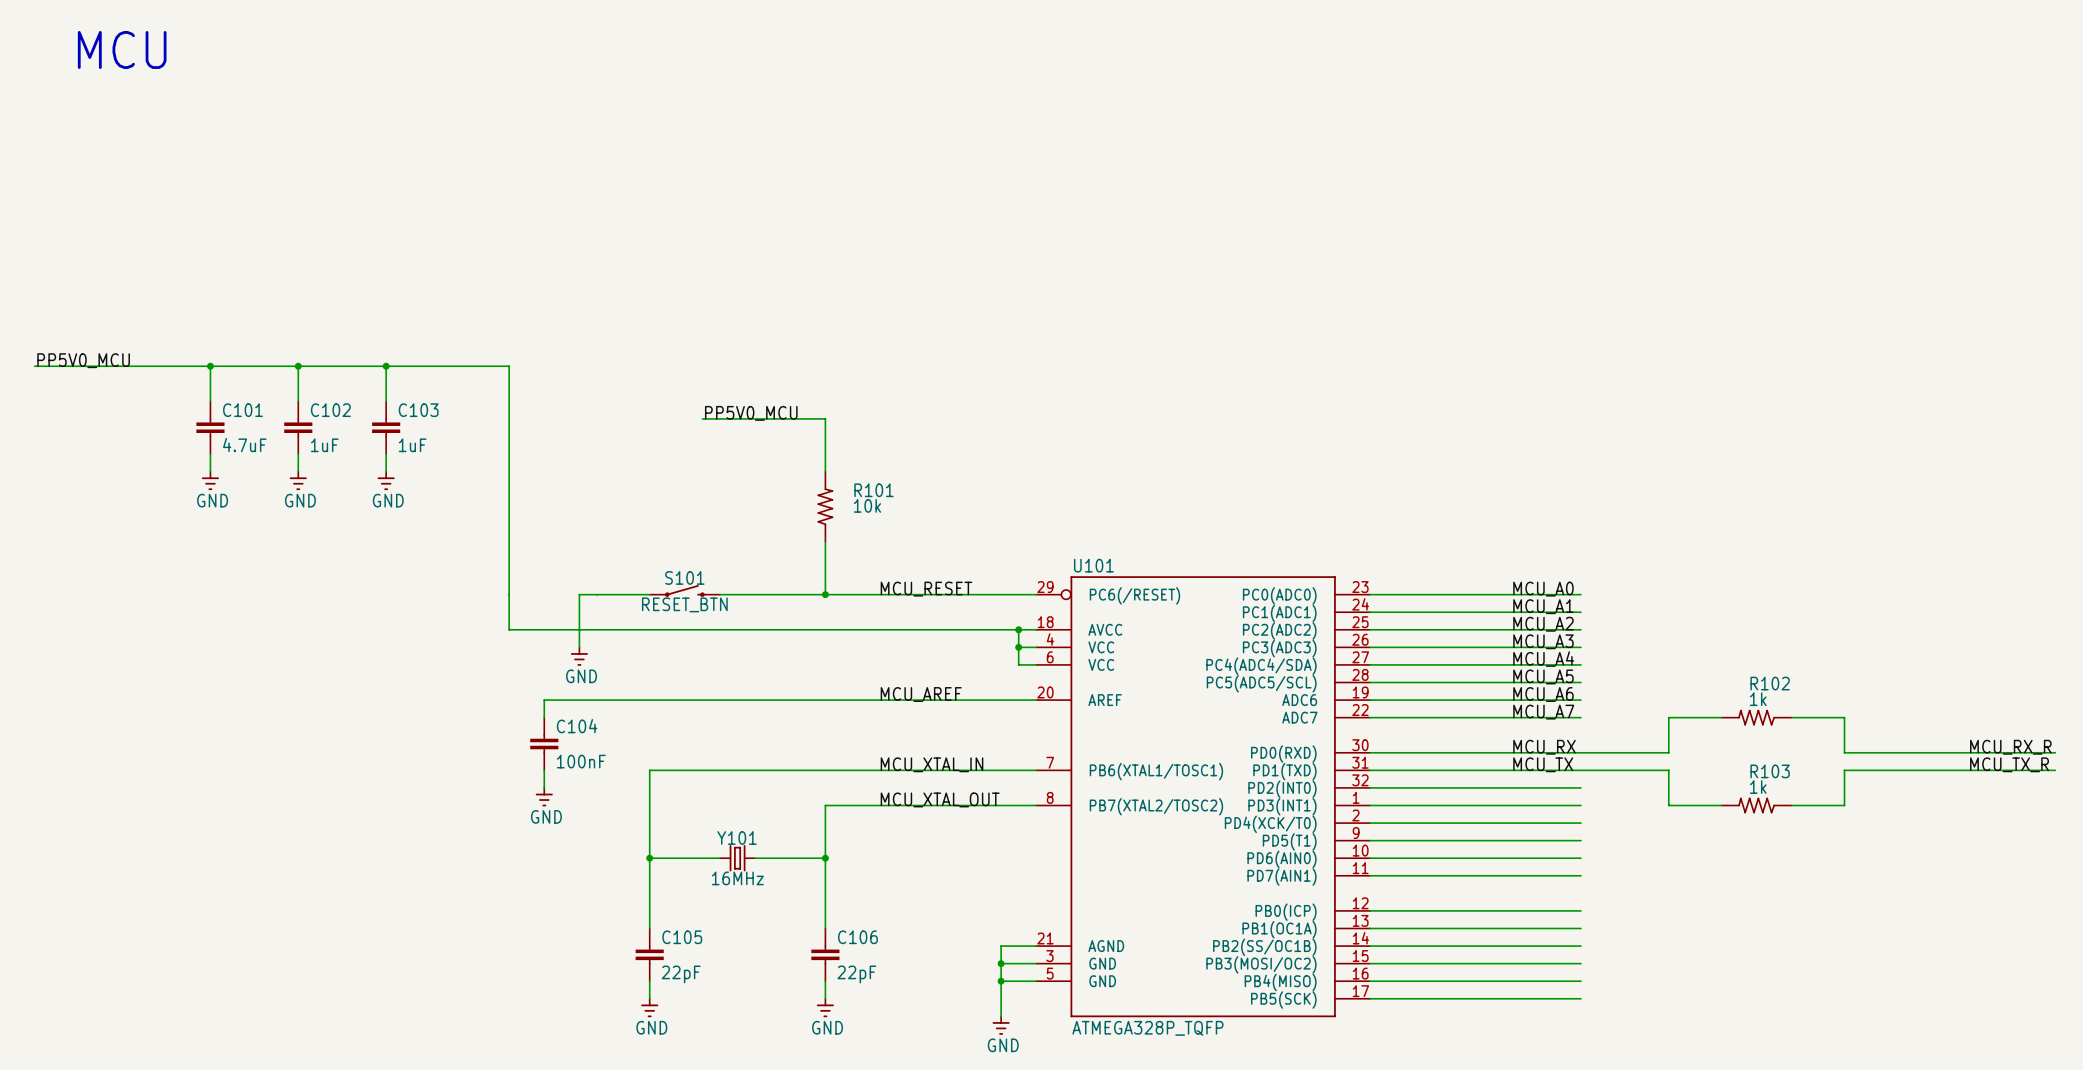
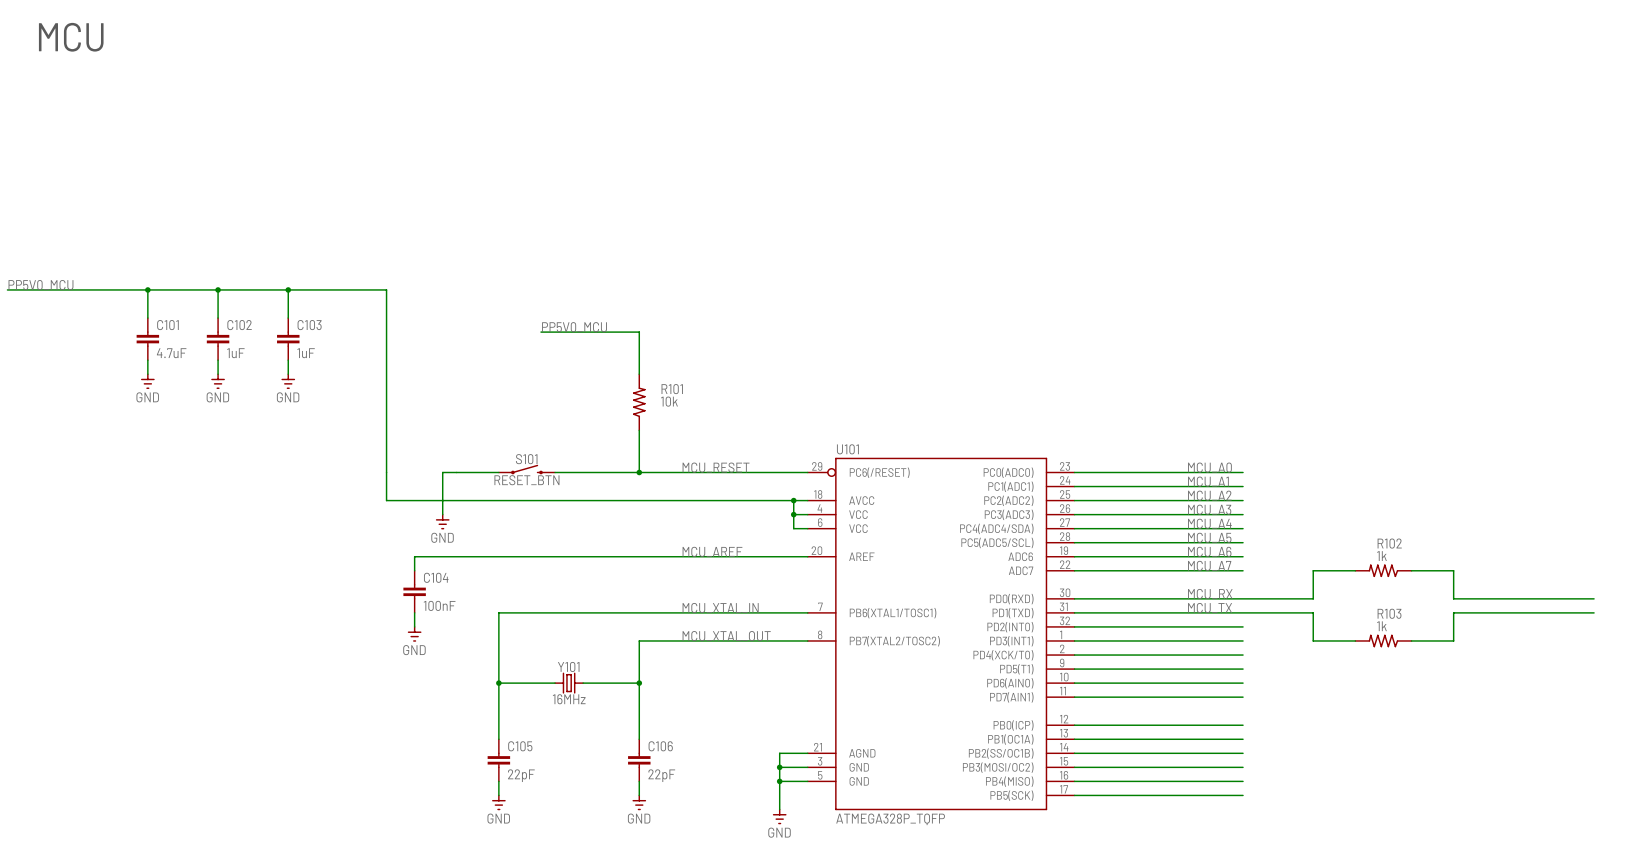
label: MCU_RX_R (2010, 747) -> none
wire: (2020, 752) (2055, 752) -> none
label: MCU_TX_R (2009, 764) -> none
wire: (2020, 770) (2055, 770) -> none

